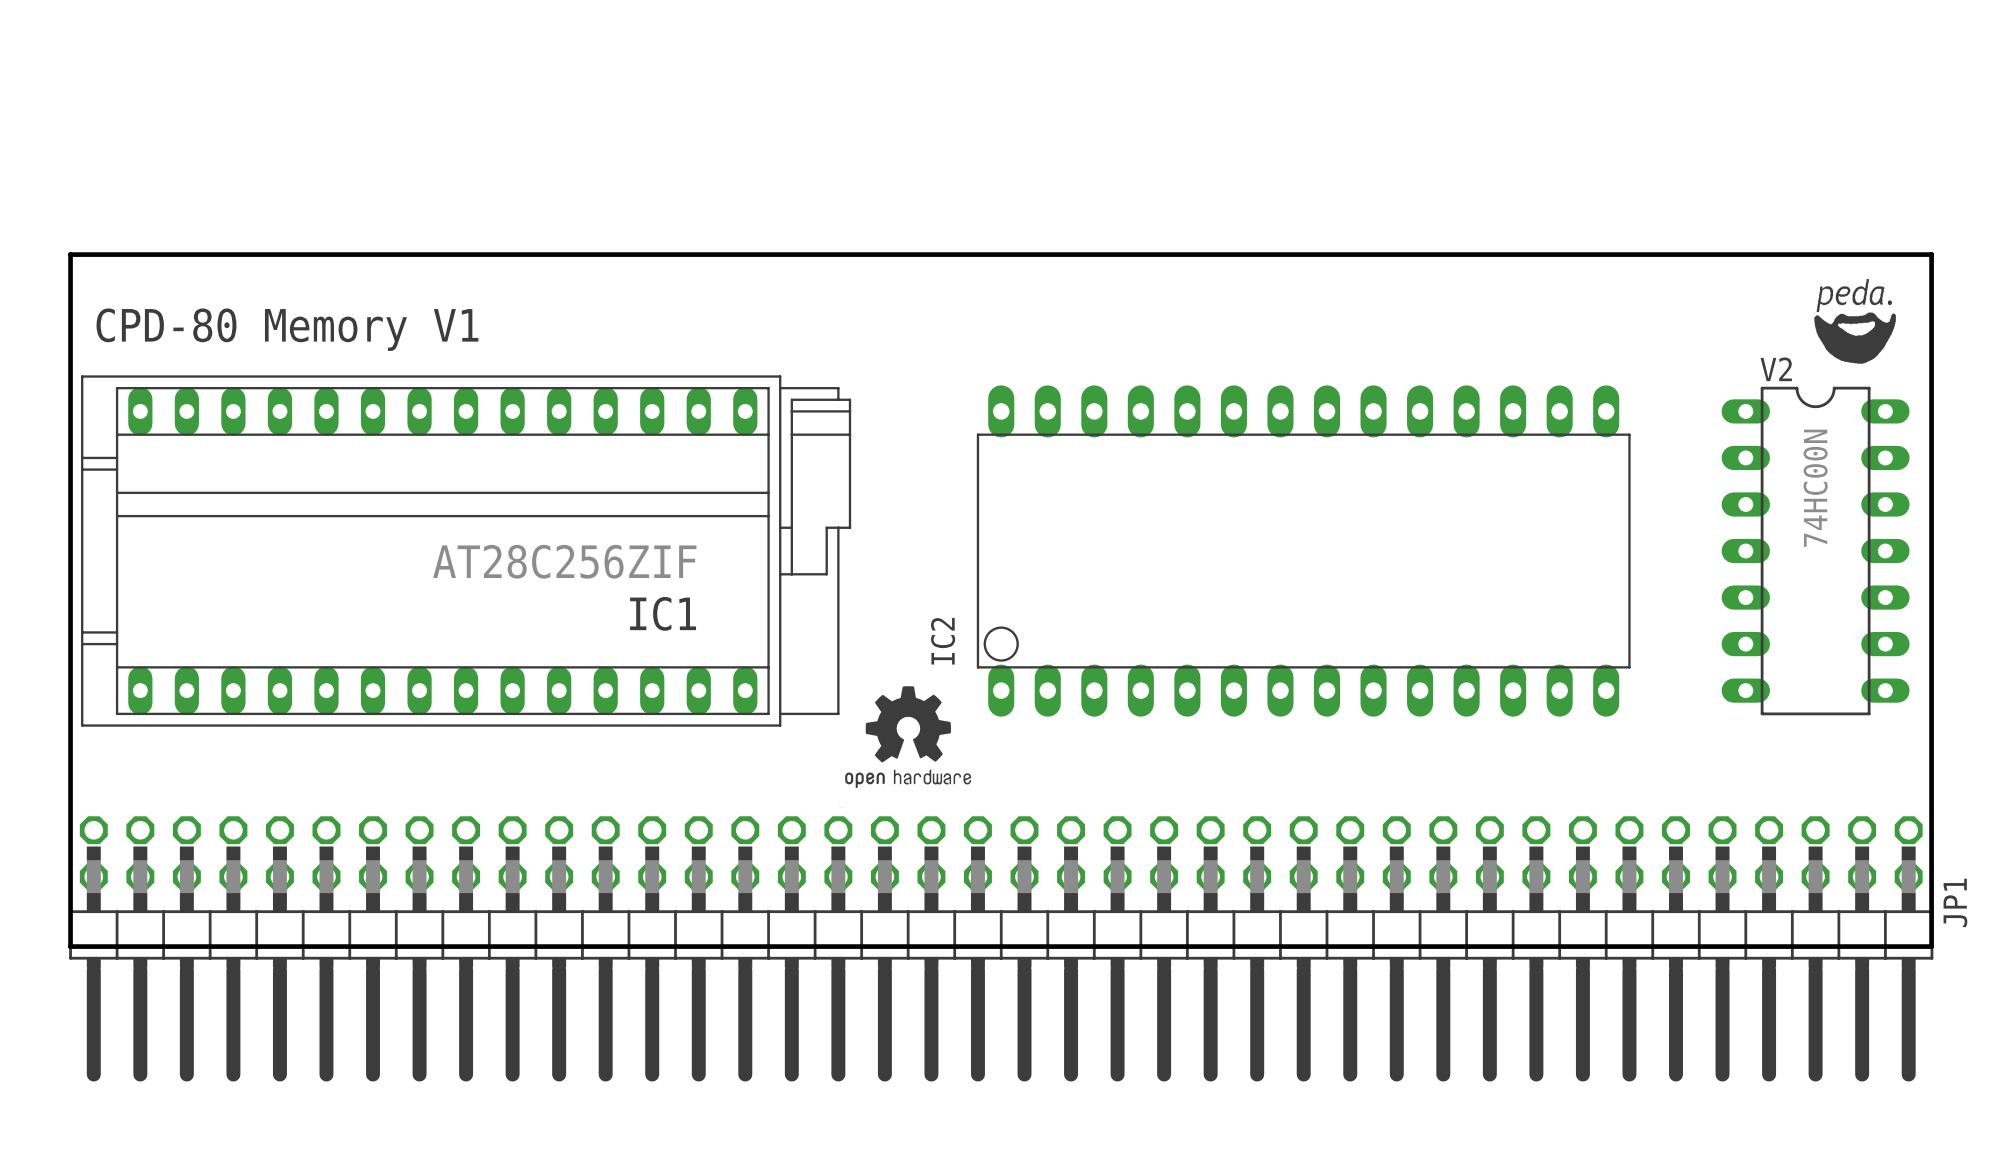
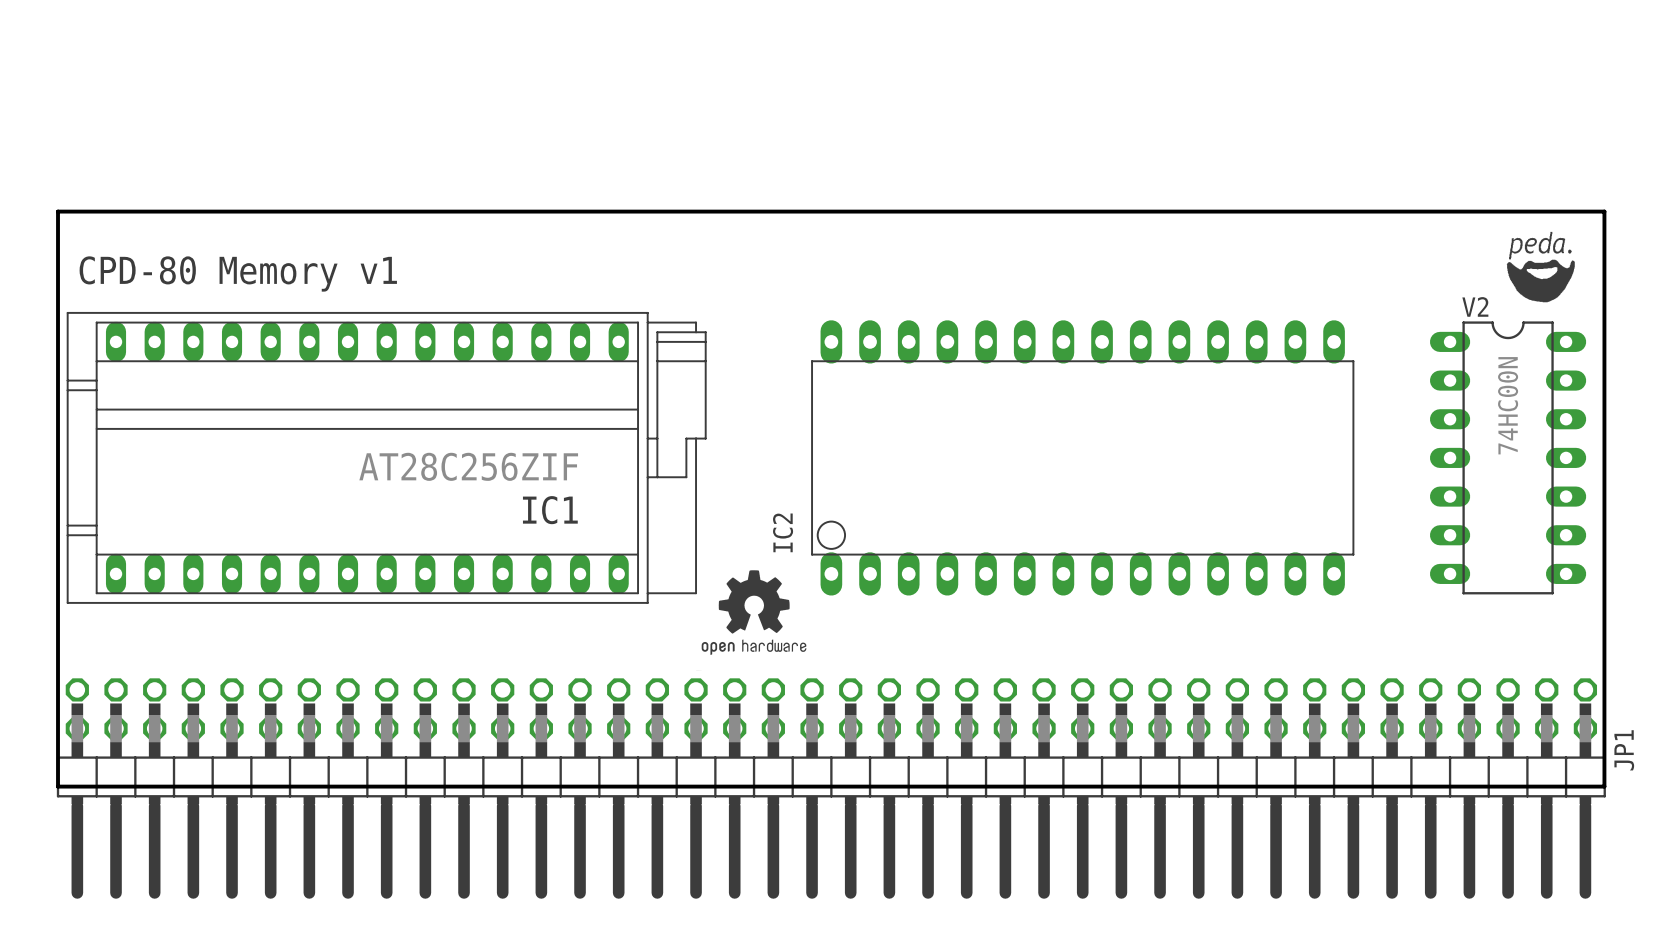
text: CPD-80 Memory V1 (287, 329) -> CPD-80 Memory v1 (238, 273)

